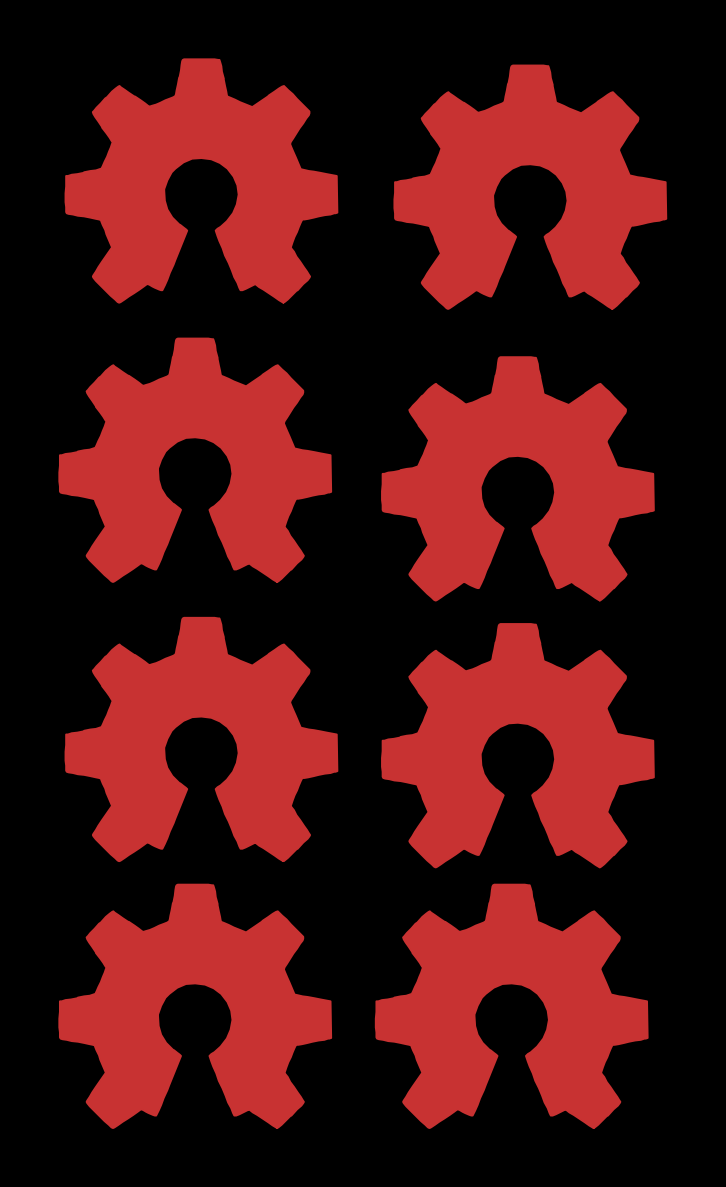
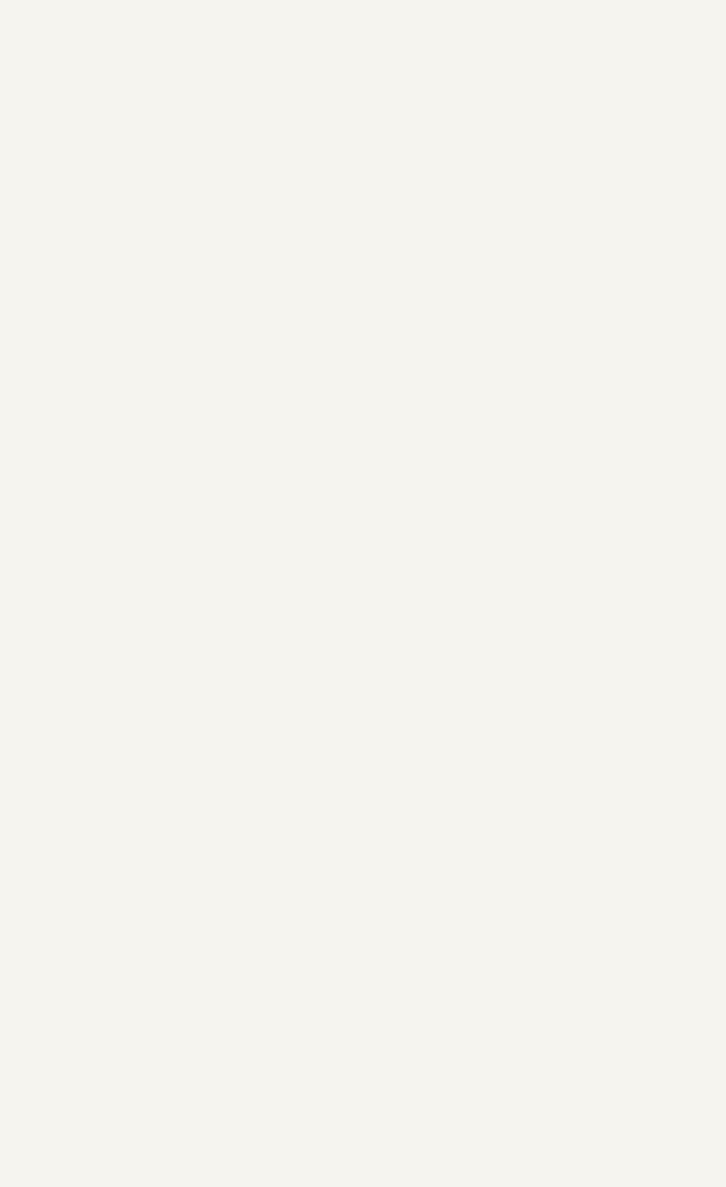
part: (201, 180) -> none
part: (530, 187) -> none
part: (195, 460) -> none
part: (517, 478) -> none
part: (201, 739) -> none
part: (517, 745) -> none
part: (195, 1006) -> none
part: (511, 1006) -> none

